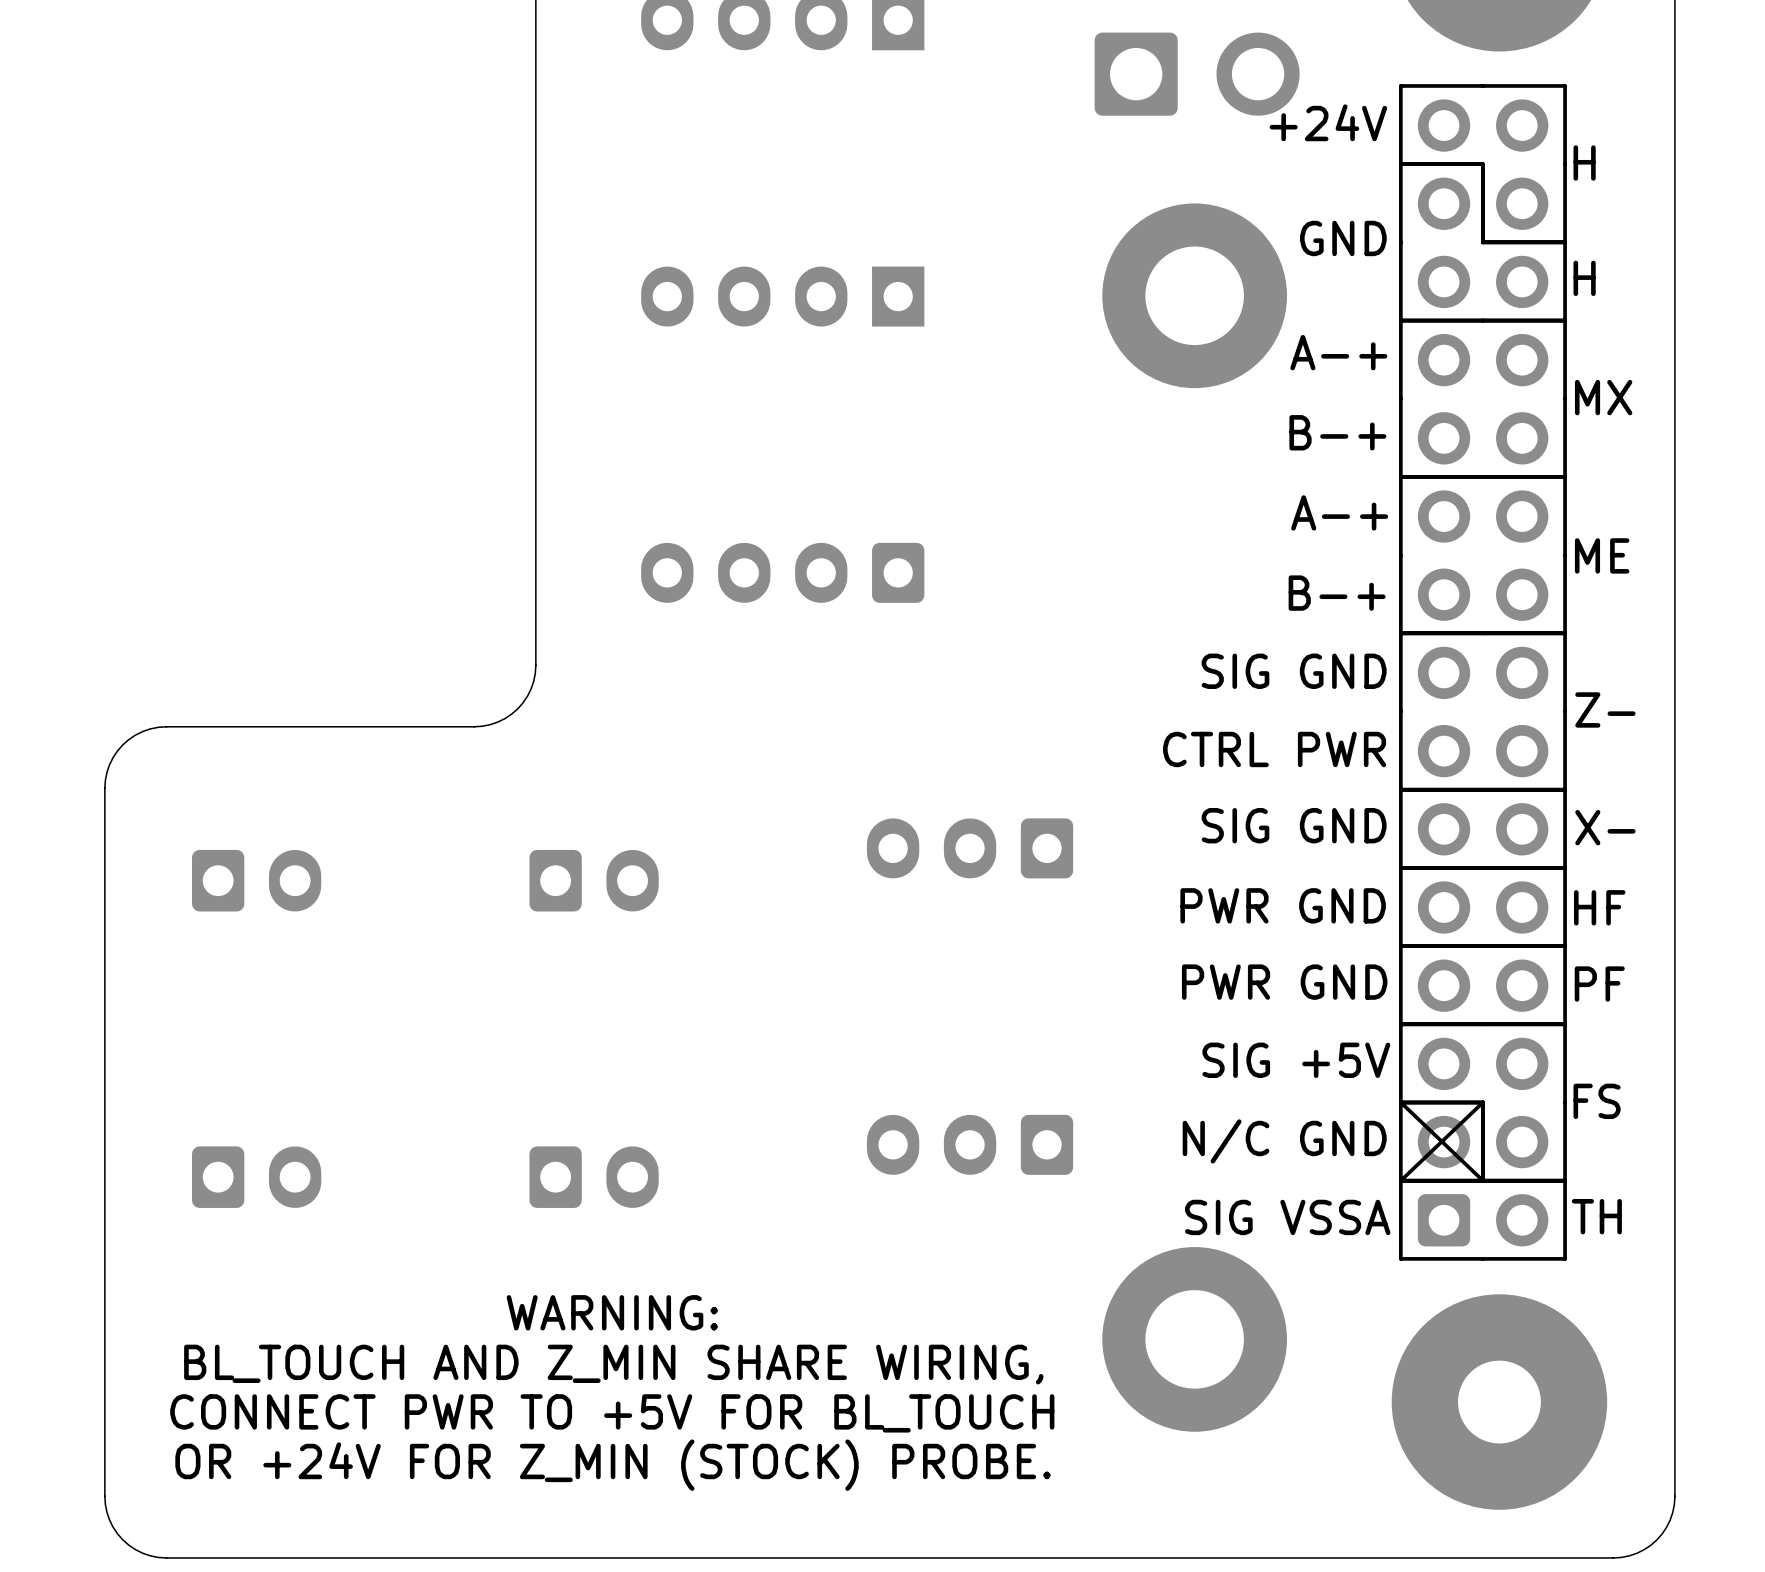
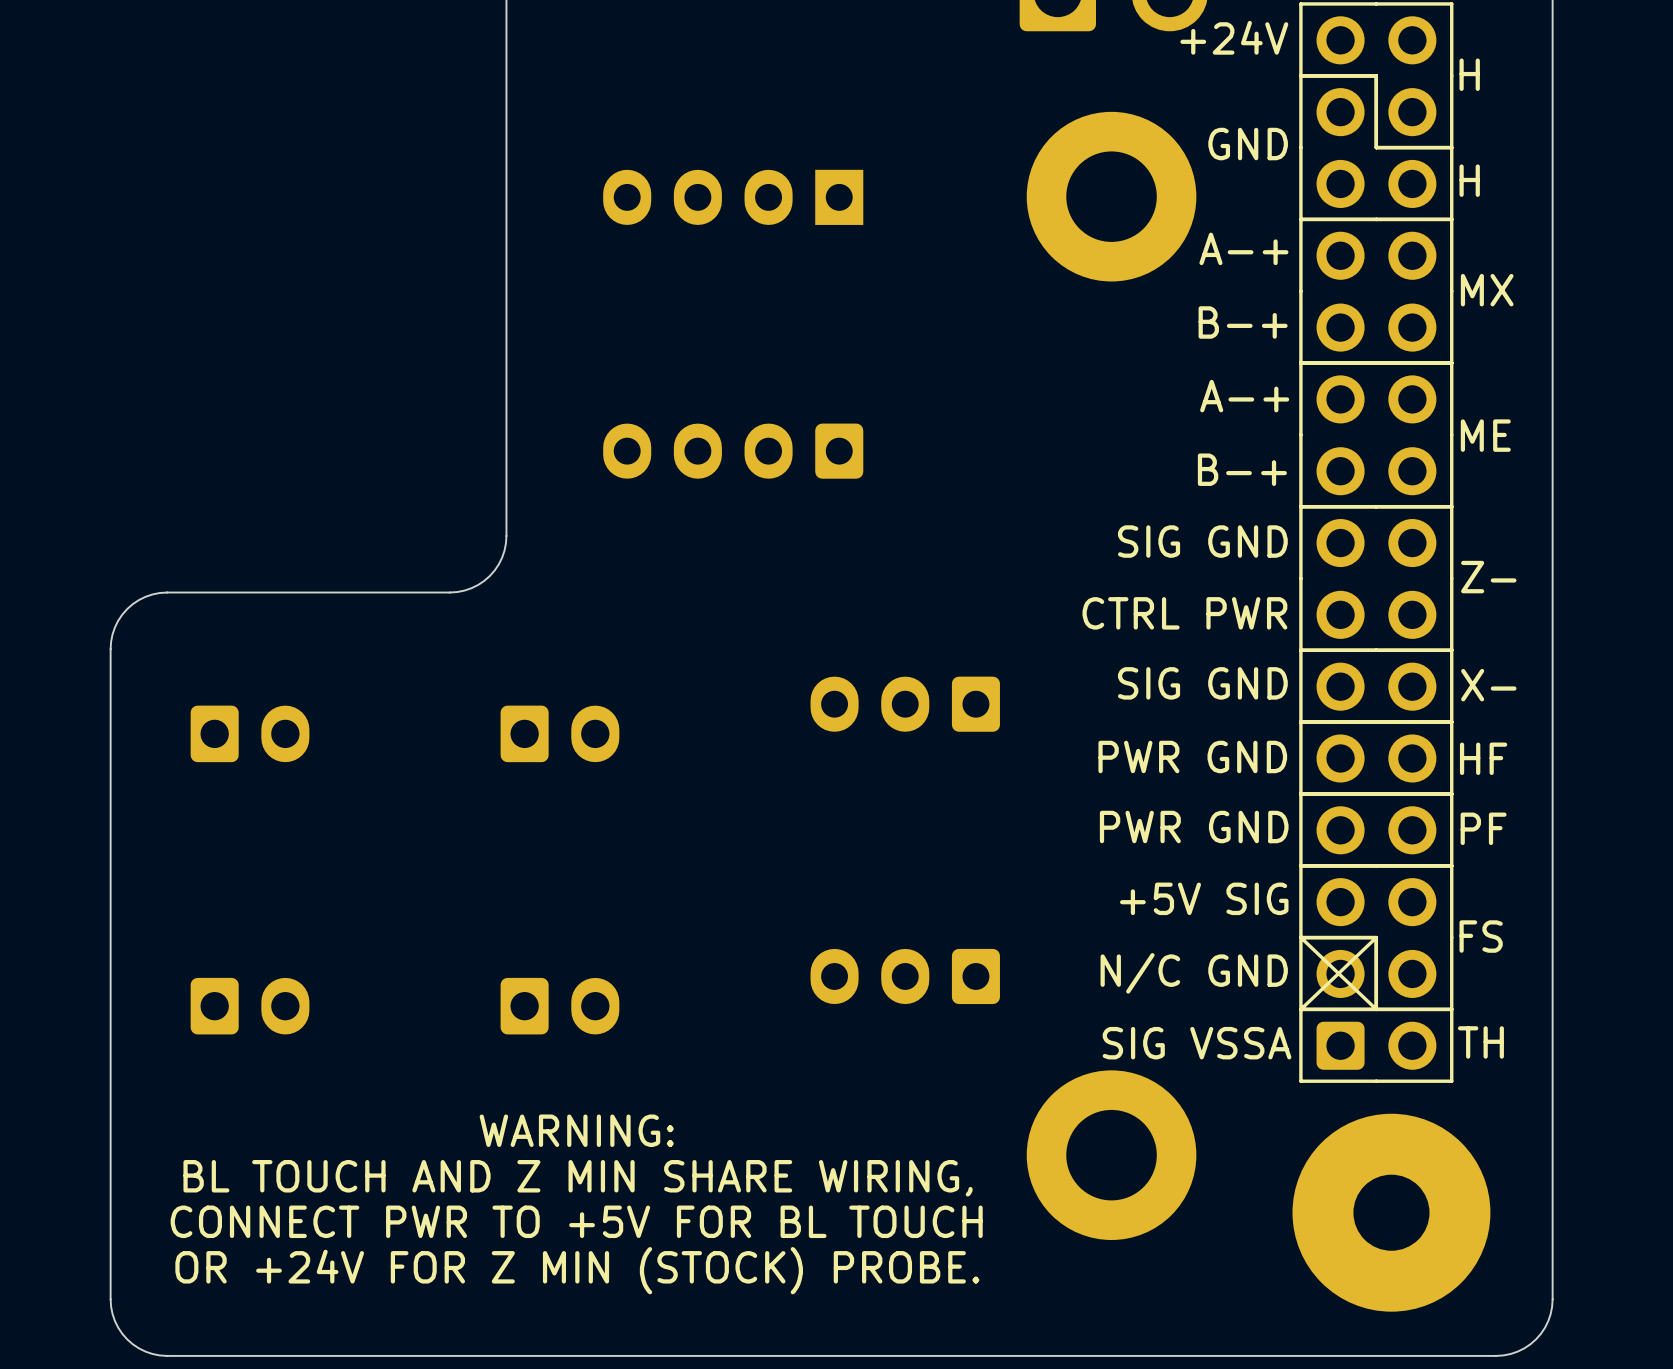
text: SIG +5V (1296, 1060) -> +5V SIG (1204, 898)
text: BL_TOUCH AND Z_MIN SHARE WIRING, (613, 1364) -> BL TOUCH AND Z MIN SHARE WIRING, (578, 1178)
text: CONNECT PWR TO +5V FOR BL_TOUCH (612, 1413) -> CONNECT PWR TO +5V FOR BL TOUCH (576, 1221)
text: OR +24V FOR Z_MIN (STOCK) PROBE. (613, 1465) -> OR +24V FOR Z MIN (STOCK) PROBE. (577, 1270)

